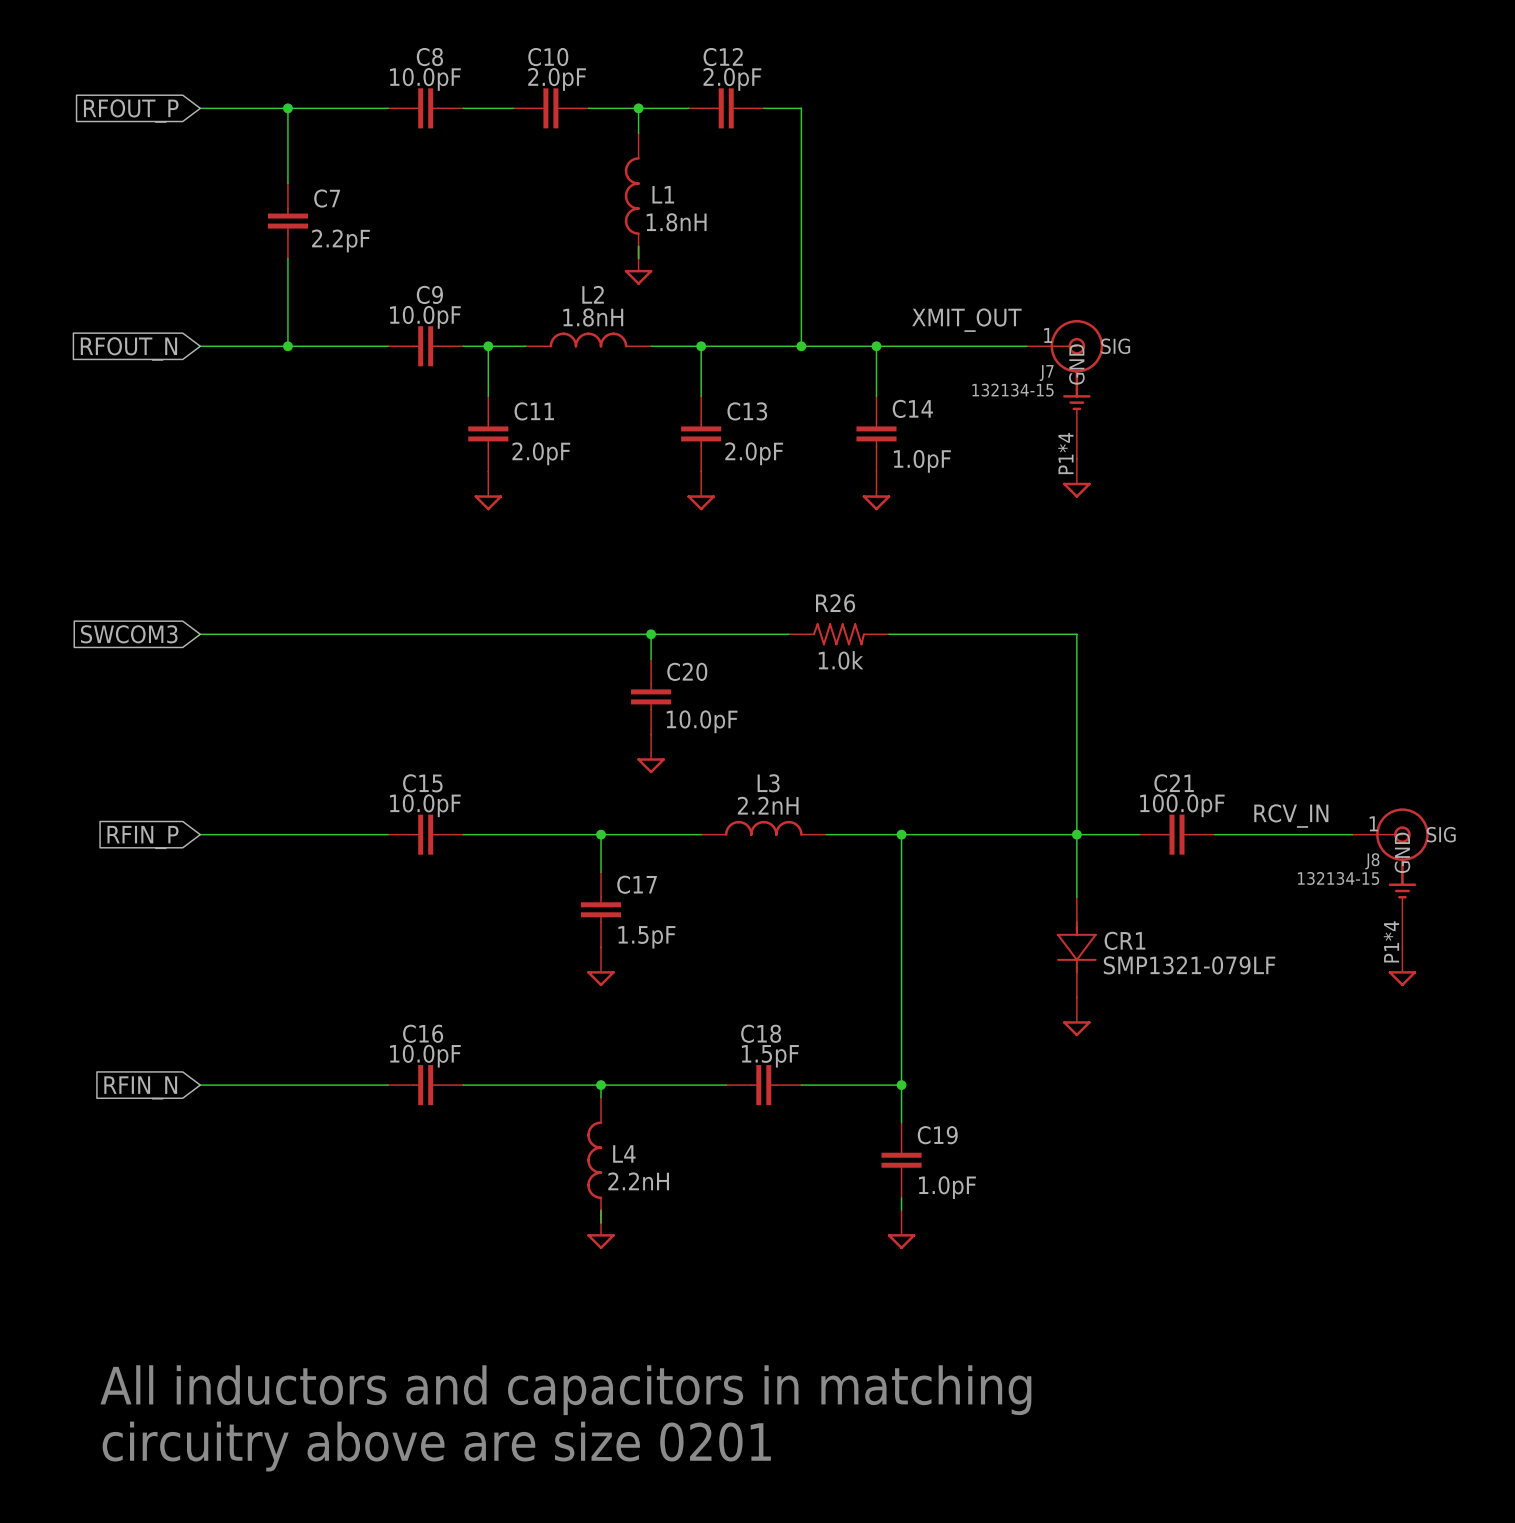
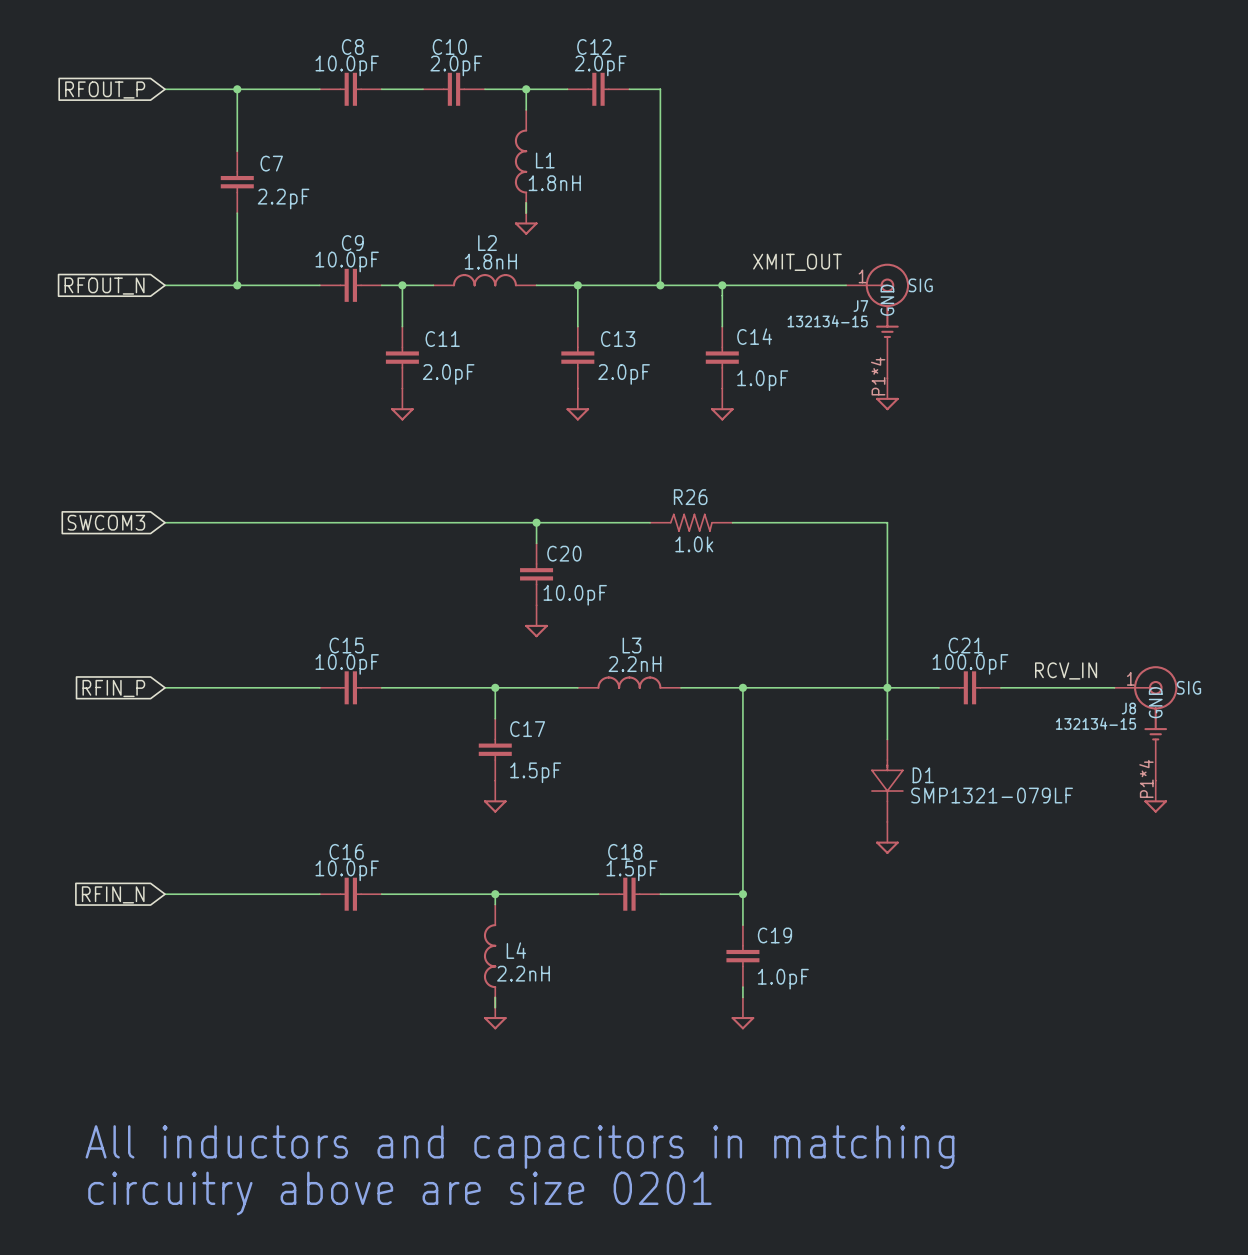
CR1 name: CR1 (1124, 940) -> D1 (923, 775)

